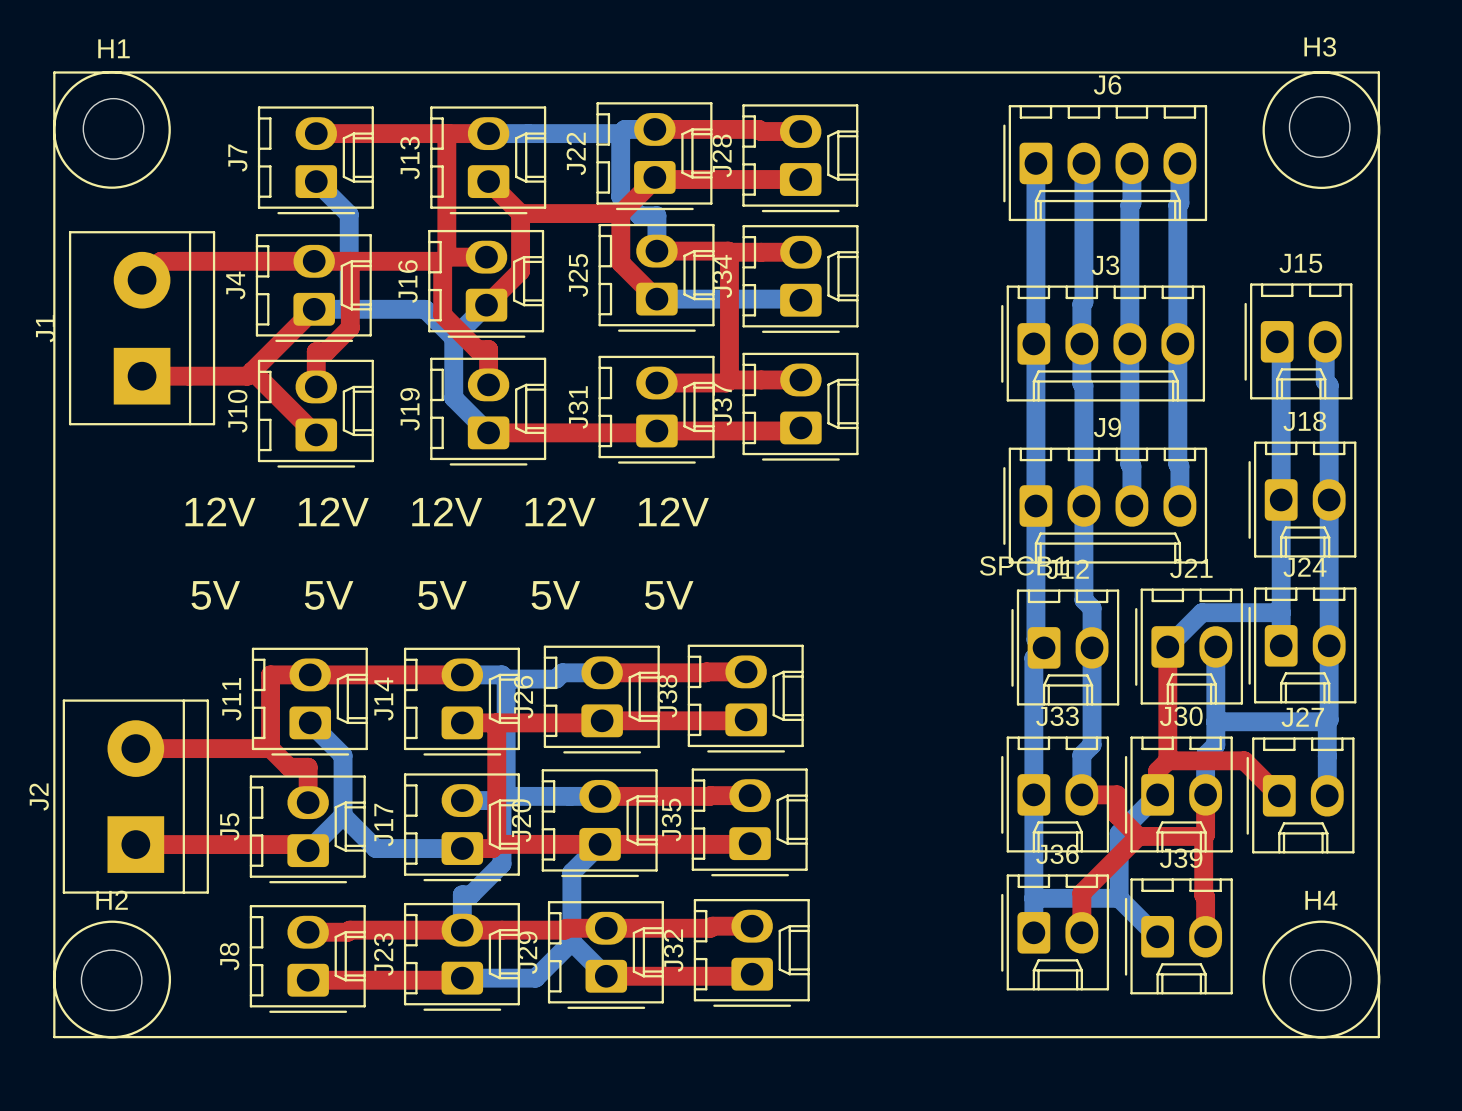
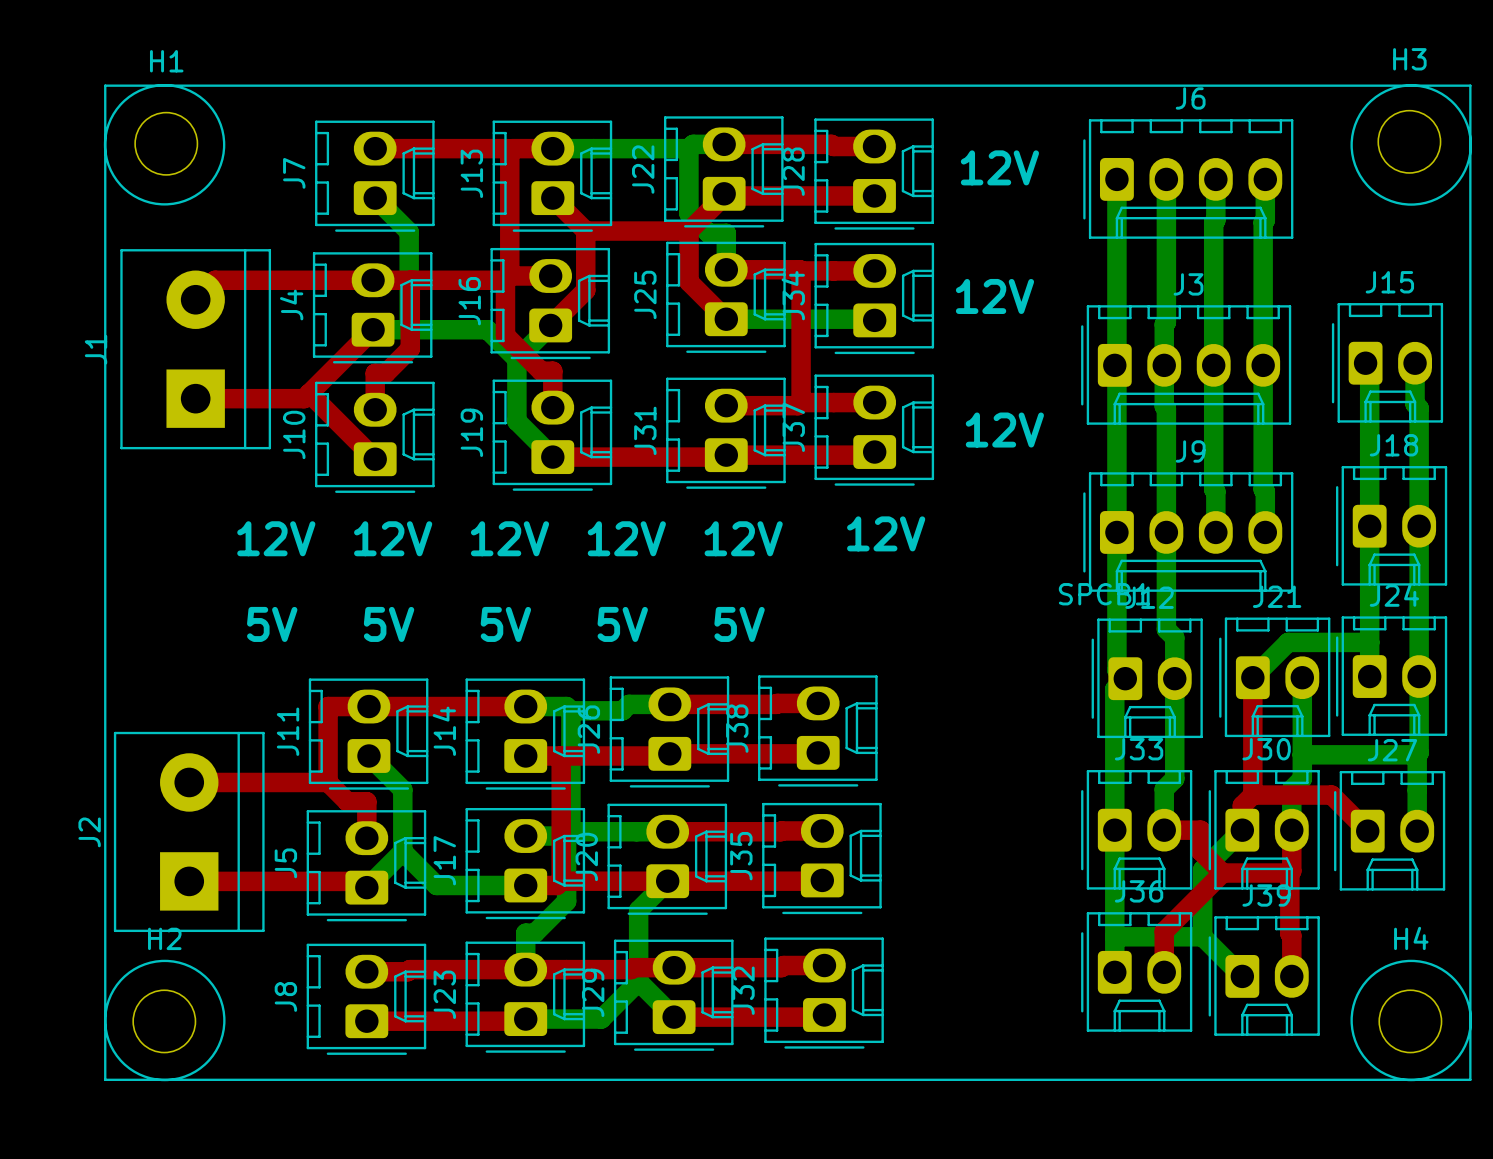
text: none -> 12V (999, 167)
text: none -> 12V (994, 296)
text: none -> 12V (1004, 430)
text: none -> 12V (886, 533)

